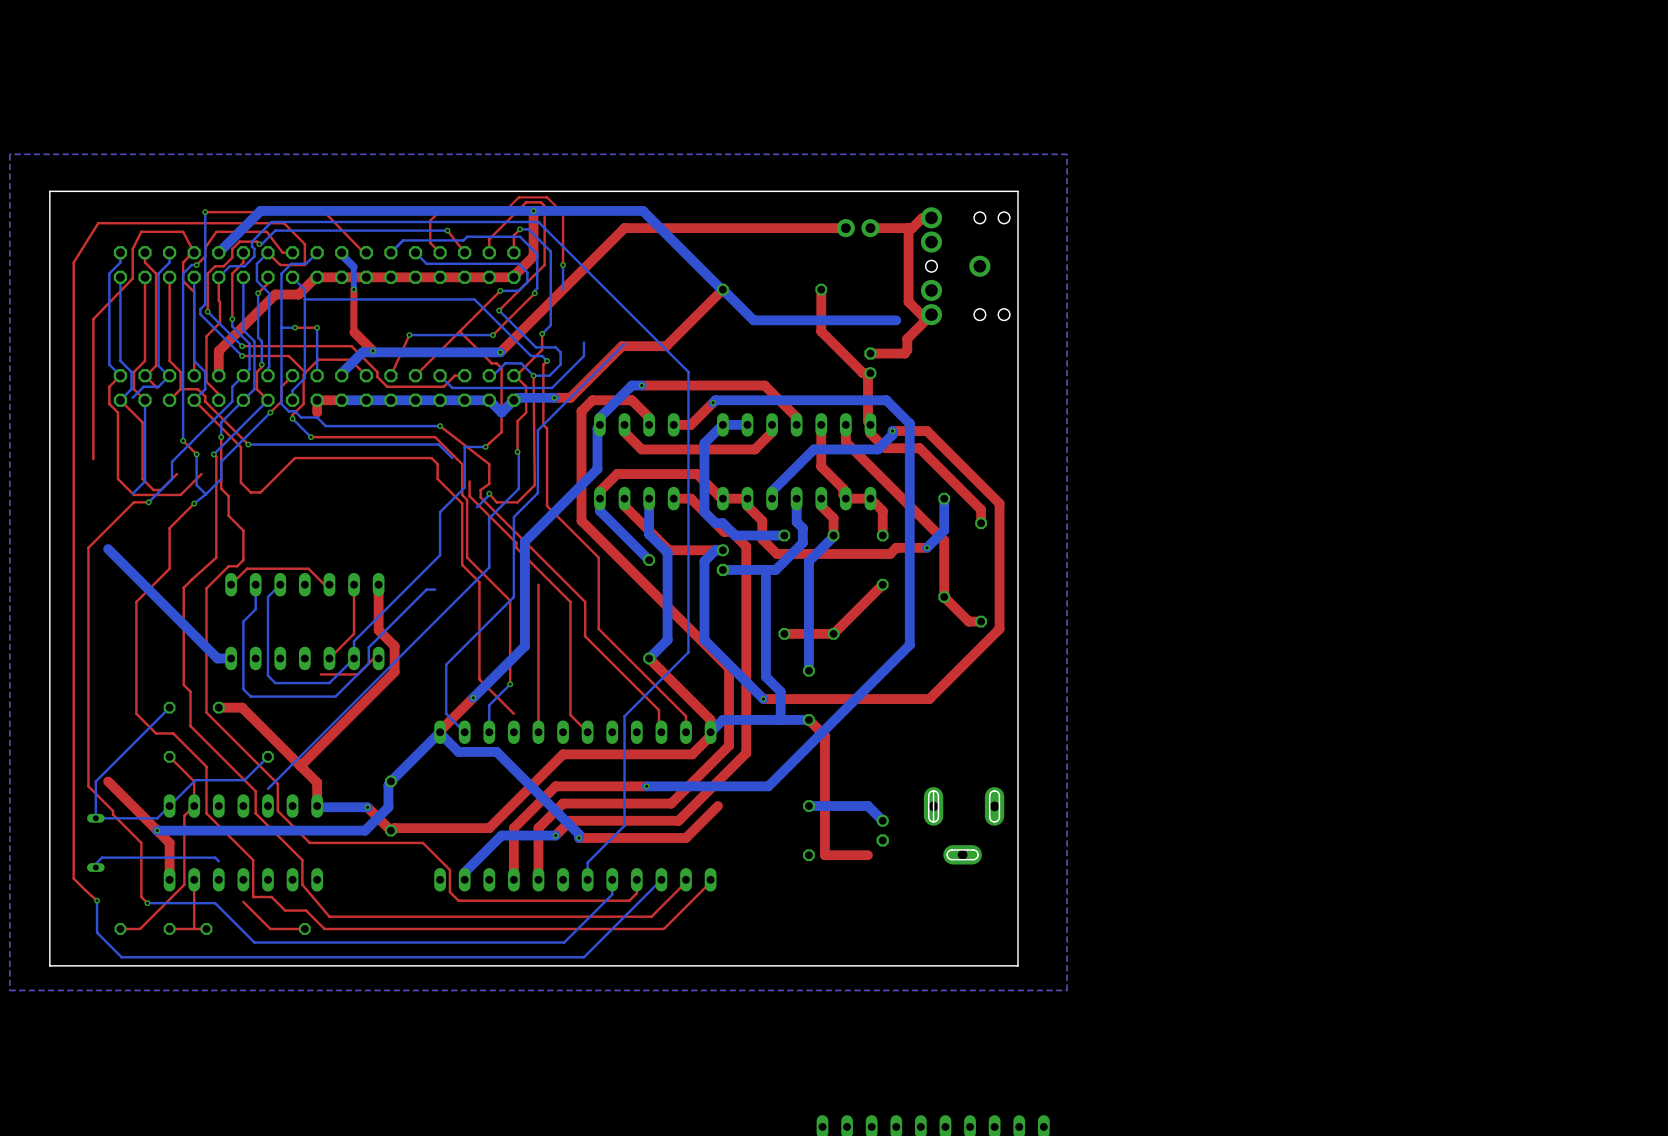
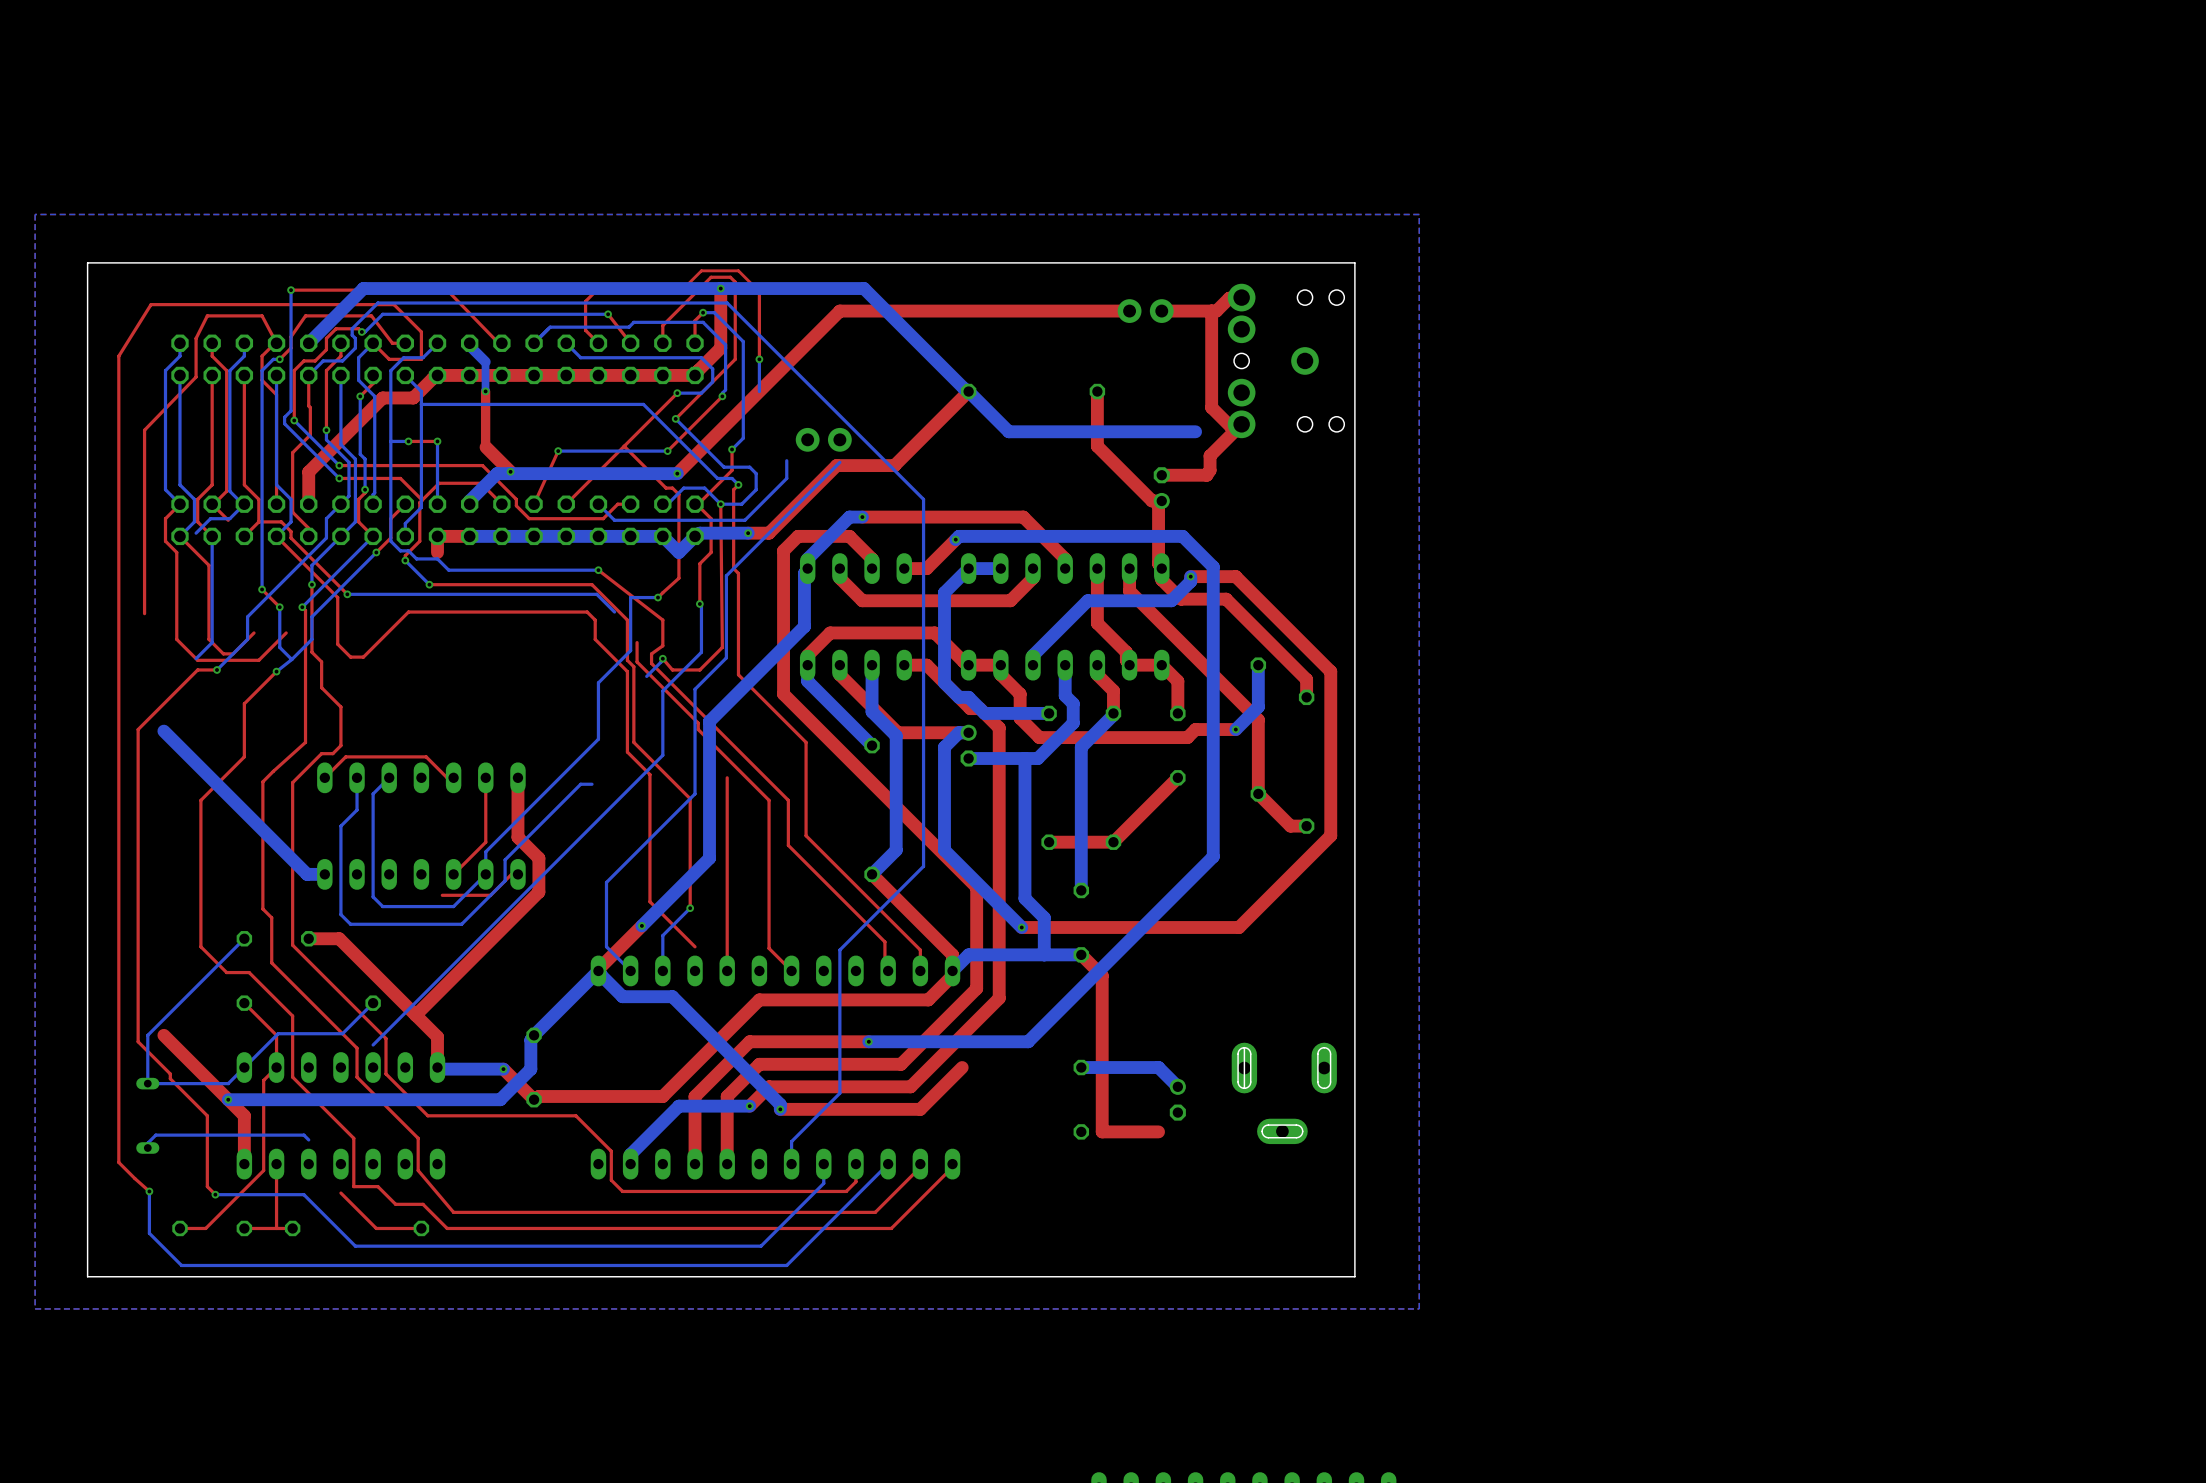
part: none -> (823, 439)

